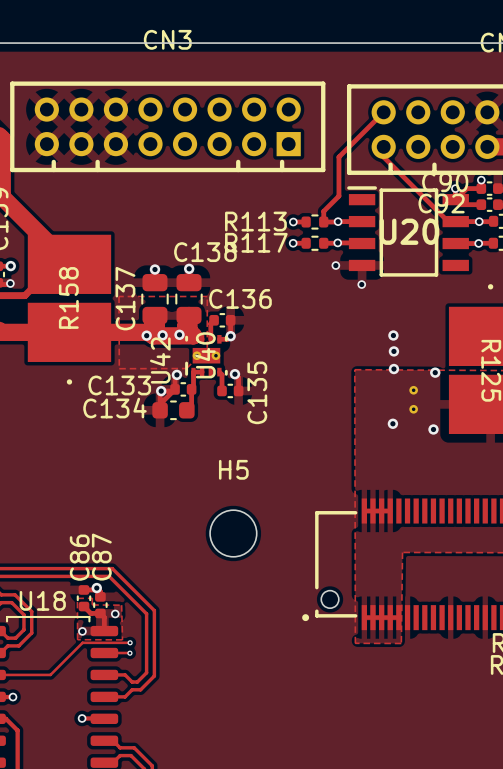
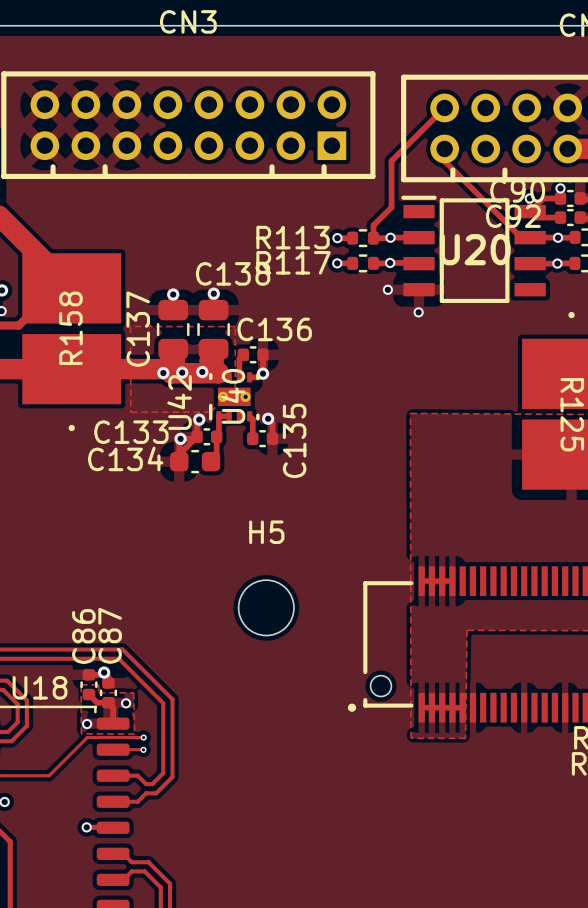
via: (393, 335) -> none
via: (393, 351) -> none
via: (393, 369) -> none
via: (435, 372) -> none
part: (413, 399) -> none
via: (392, 423) -> none
via: (433, 429) -> none

